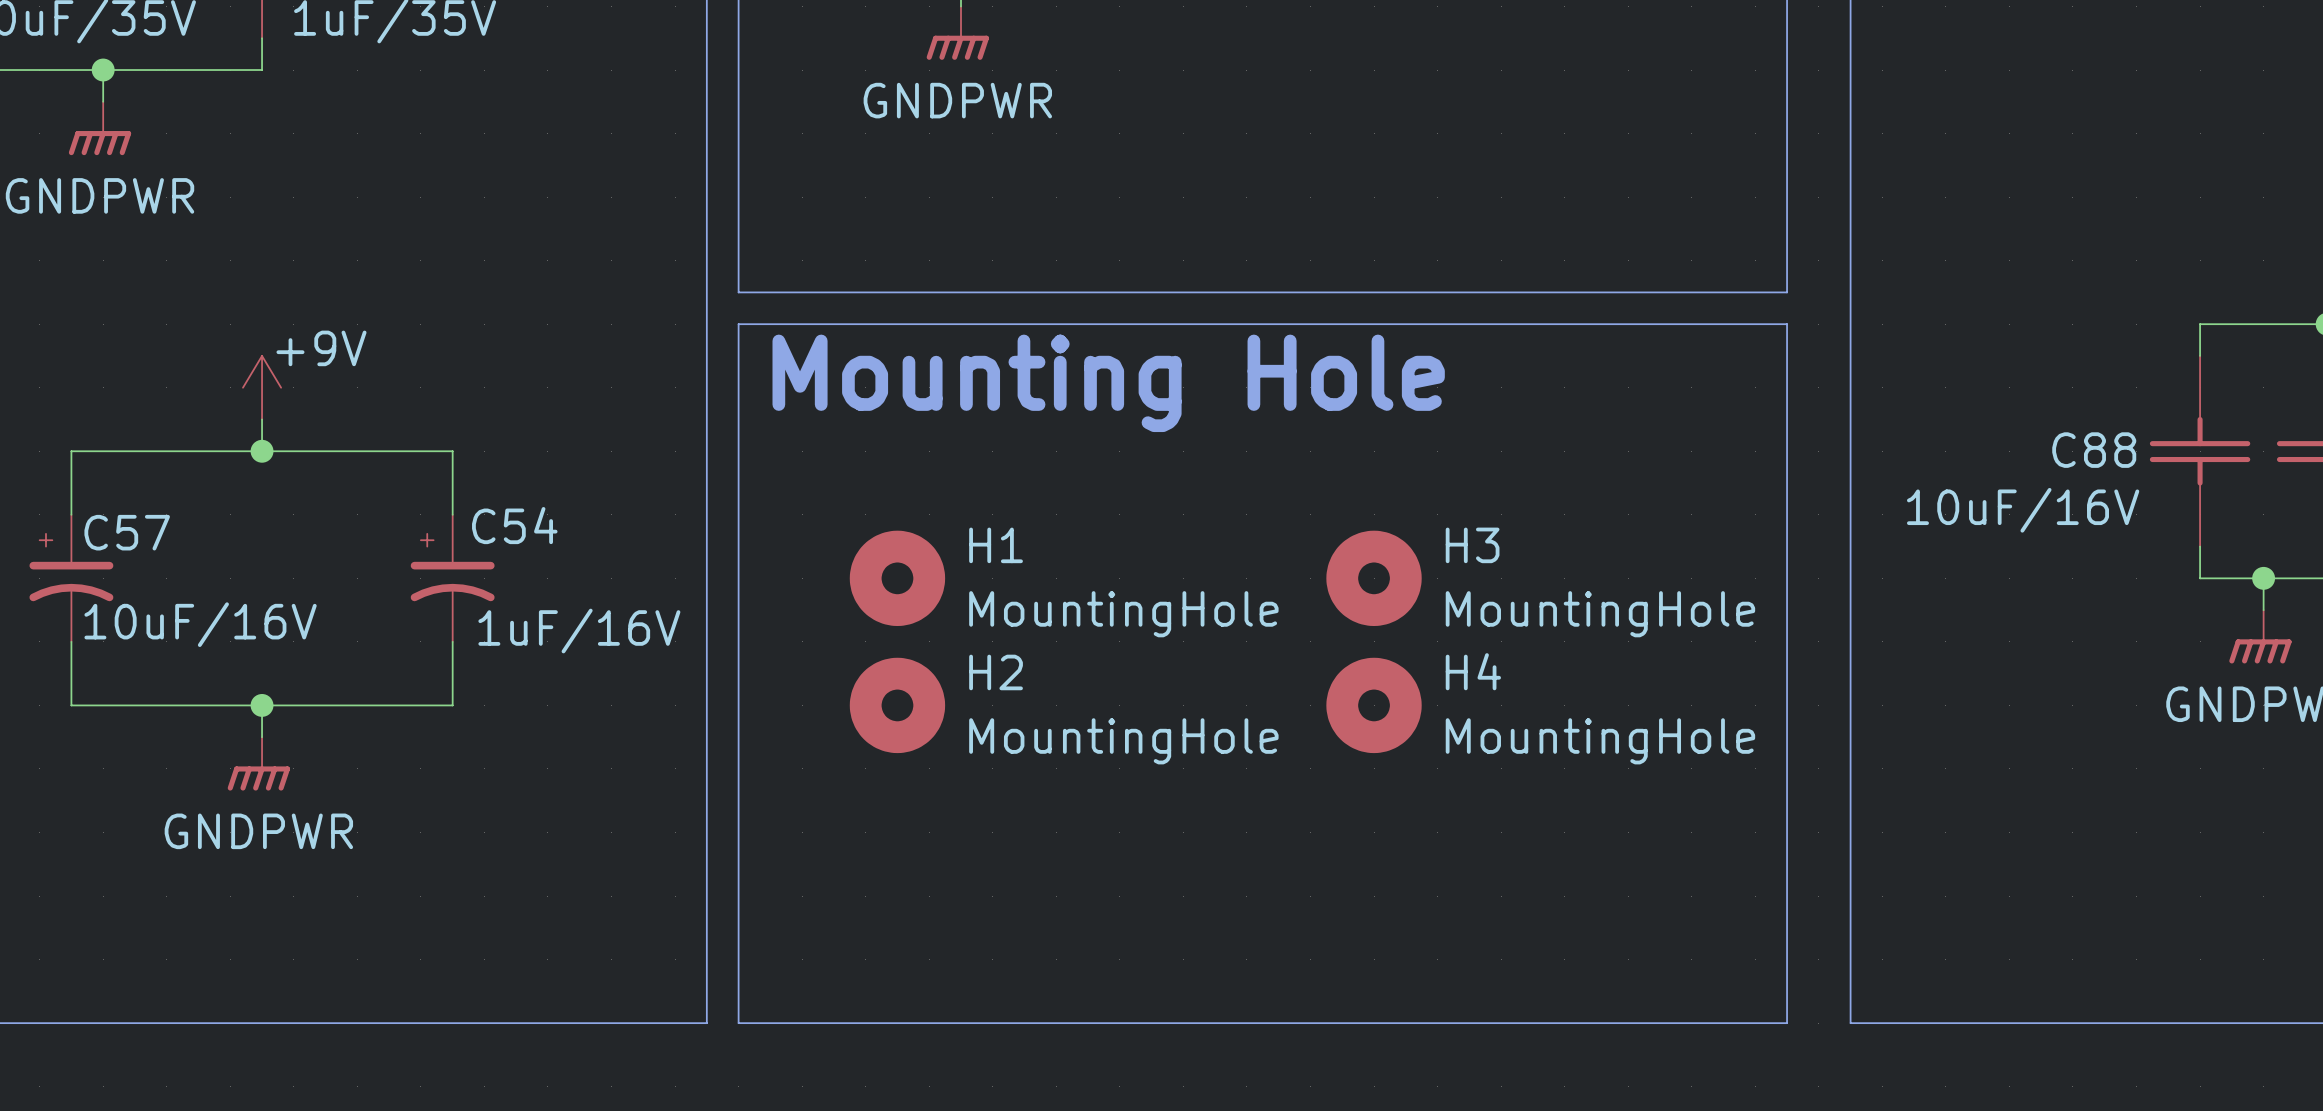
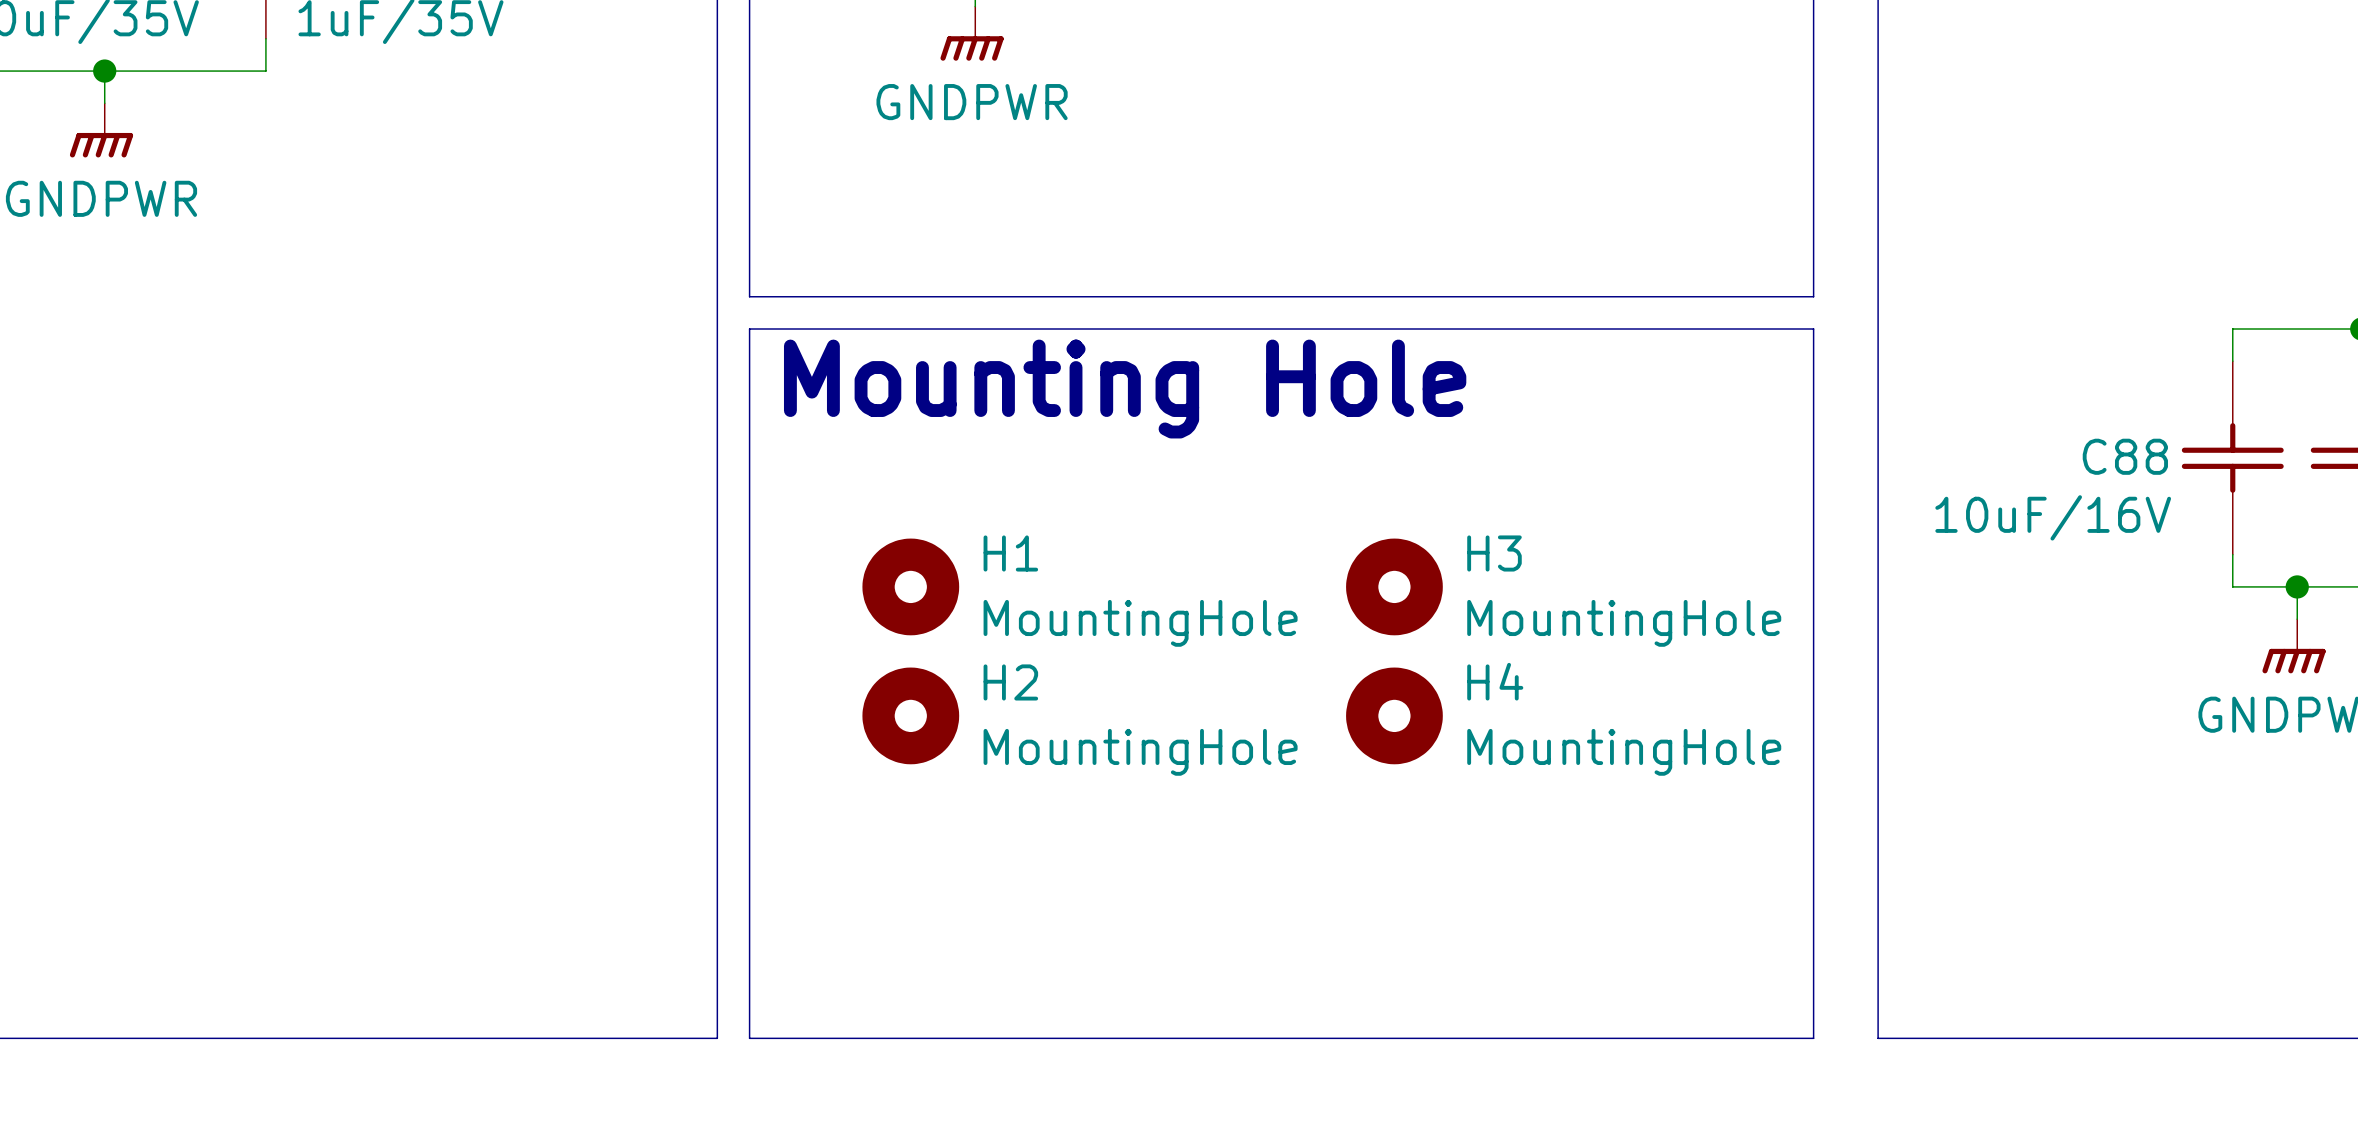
power symbol: +9V (262, 387) -> none
wire: (262, 419) (262, 451) -> none
junction: (262, 451) -> none
wire: (71, 514) (71, 451) (452, 451) (452, 514) -> none
C57: 10uF/16V (71, 578) -> none
C54: 1uF/16V (452, 578) -> none
wire: (71, 641) (71, 705) (452, 705) (452, 641) -> none
wire: (262, 705) (262, 737) -> none
junction: (262, 705) -> none
power symbol: GNDPWR (258, 763) -> none

